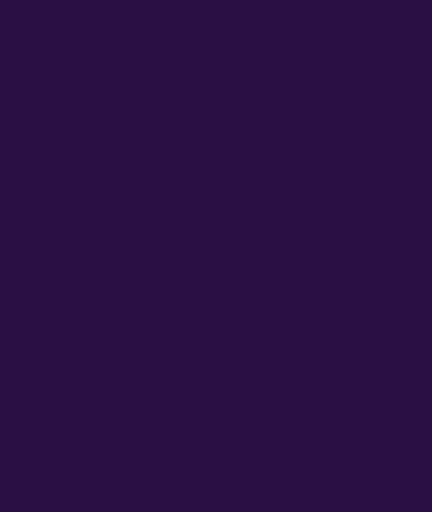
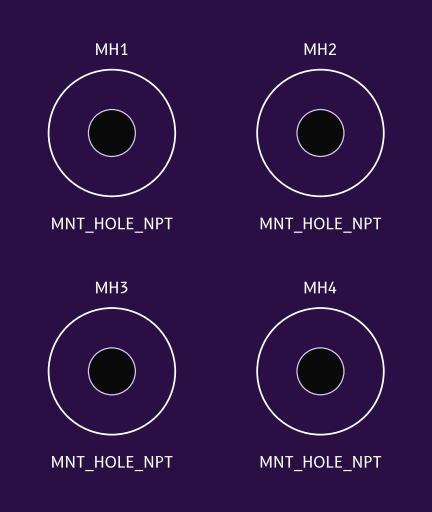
MH1: none -> MNT_HOLE_NPT (111, 132)
MH2: none -> MNT_HOLE_NPT (320, 132)
MH3: none -> MNT_HOLE_NPT (111, 371)
MH4: none -> MNT_HOLE_NPT (320, 371)

